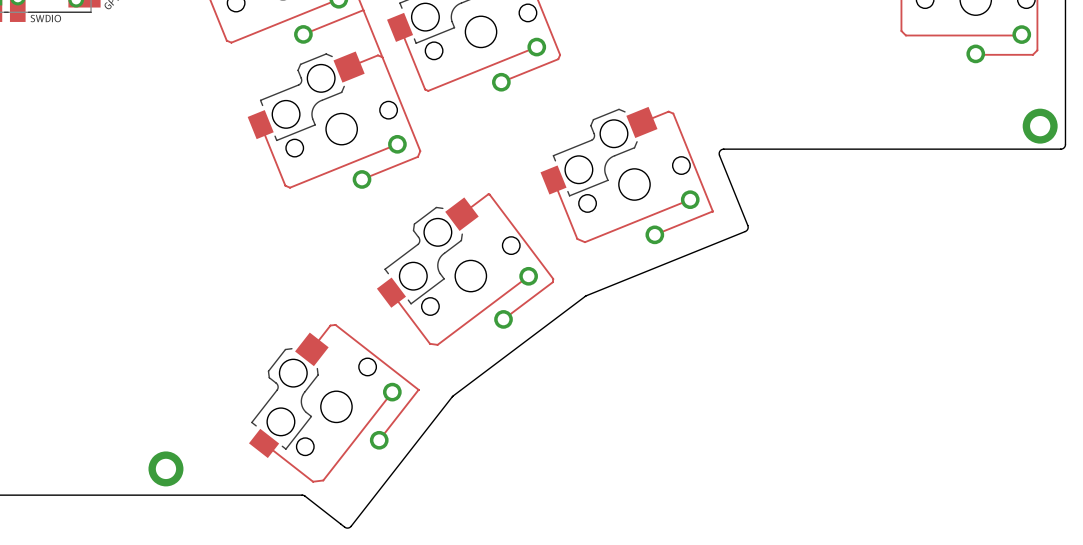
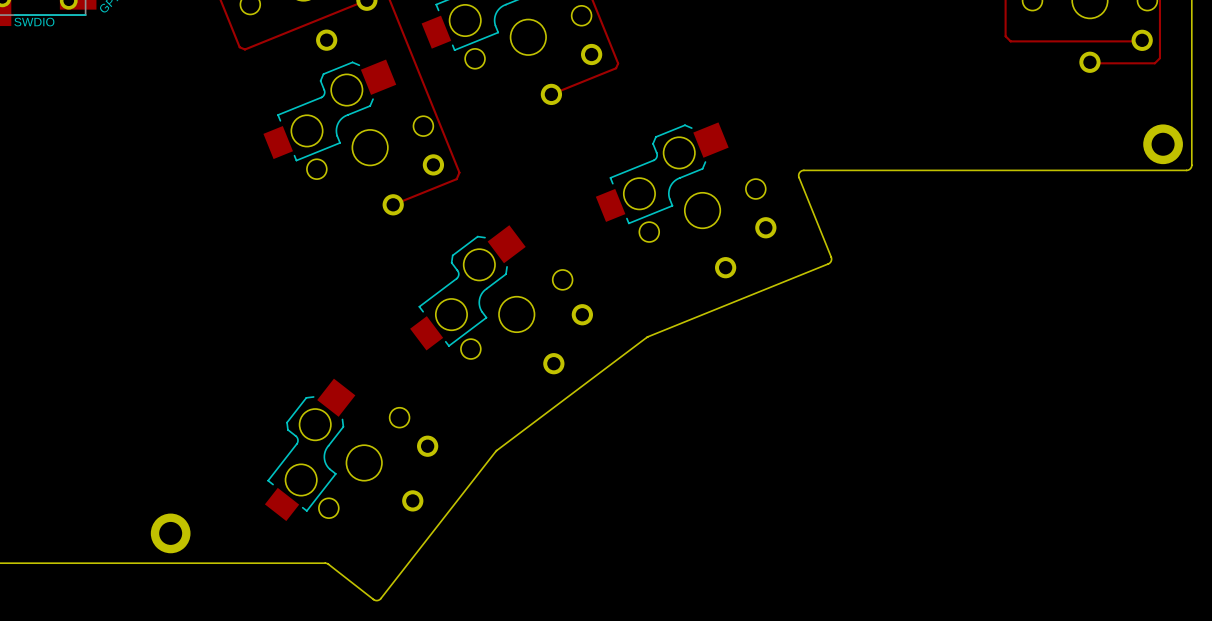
track: (363, 10) (303, 34) -> none
track: (400, 27) (425, 89) (428, 90) (536, 47) -> none
track: (382, 57) (378, 55) (349, 67) -> none
track: (641, 122) (668, 111) (673, 113) (712, 211) (654, 234) -> none
track: (260, 124) (285, 185) (290, 187) (397, 144) -> none
track: (553, 180) (577, 238) (584, 242) (690, 199) -> none
track: (461, 214) (489, 194) (553, 279) (552, 282) (503, 319) -> none
track: (528, 276) (437, 344) (429, 343) (391, 292) -> none
track: (311, 349) (330, 325) (335, 324) (418, 390) (379, 440) -> none
track: (392, 392) (323, 480) (313, 481) (264, 443) -> none

